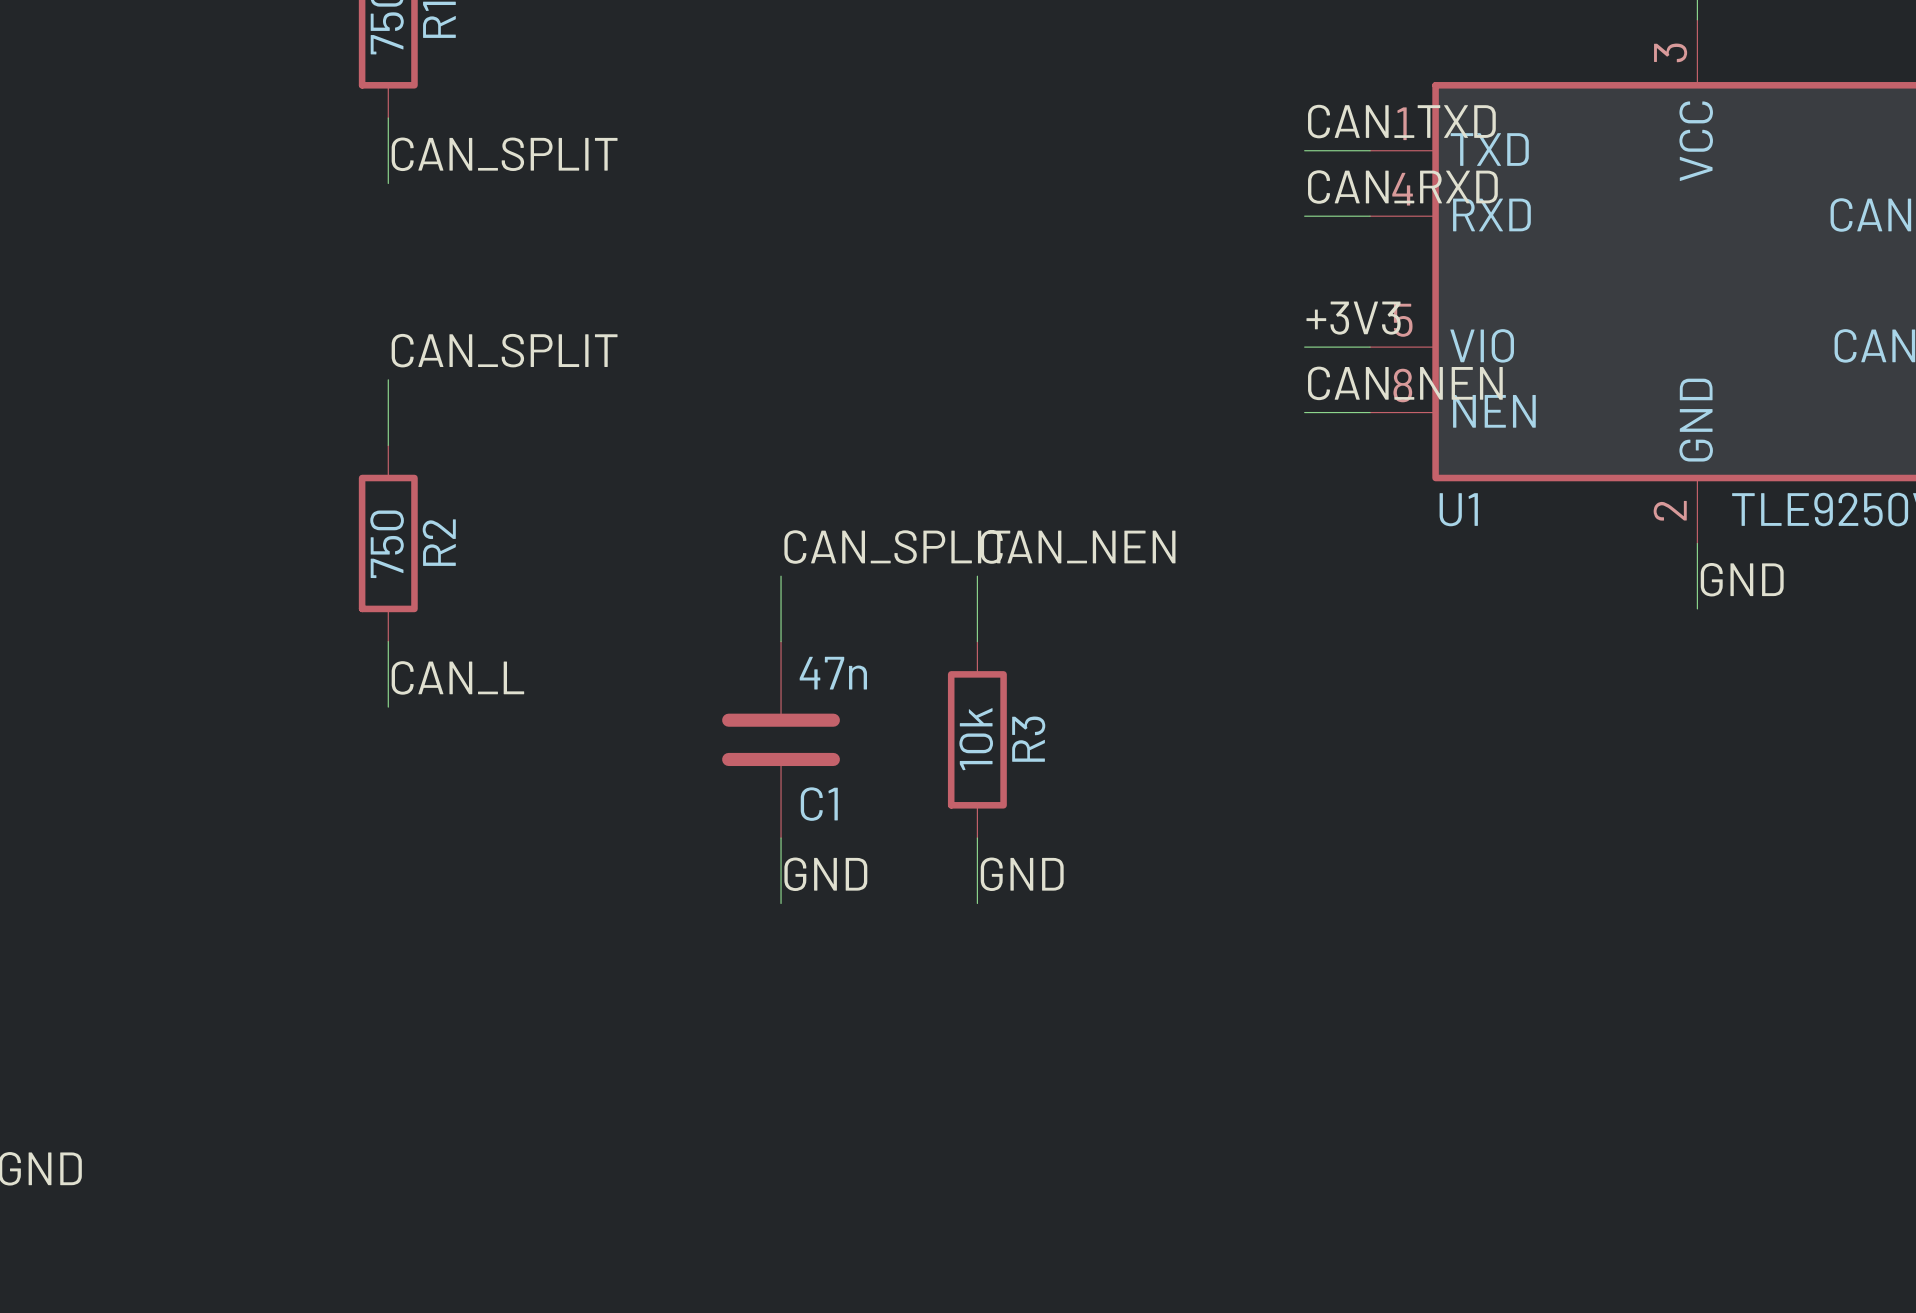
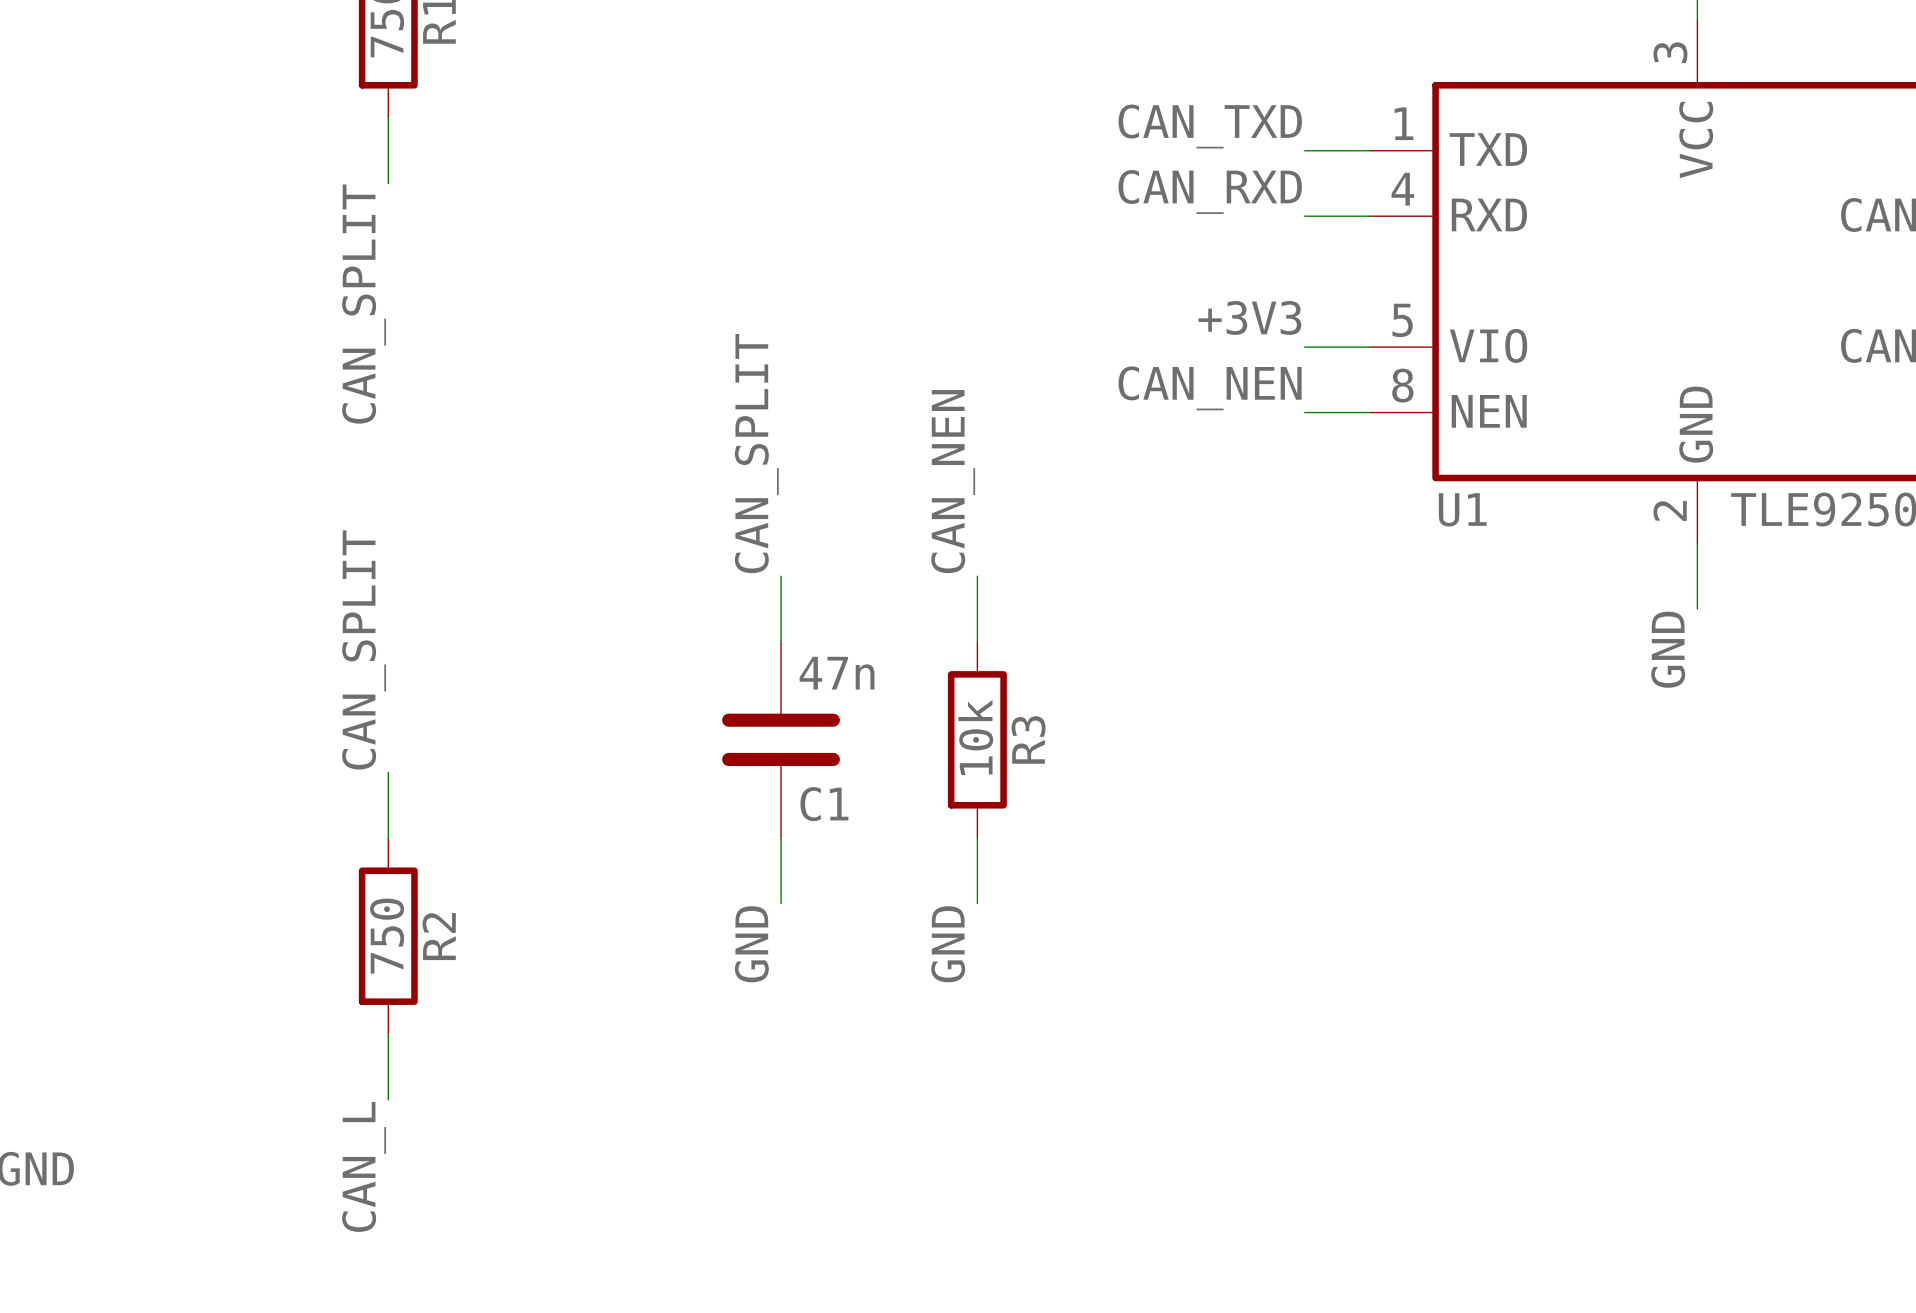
label position: CAN_TXD (1401, 121) -> CAN_TXD (1210, 126)
label rotation: 0° (504, 154) -> 90° counterclockwise (364, 304)
label position: CAN_RXD (1402, 187) -> CAN_RXD (1210, 191)
label position: +3V3 (1353, 318) -> +3V3 (1249, 317)
label rotation: 0° (504, 350) -> 90° counterclockwise (364, 649)
label position: CAN_SPLIT (504, 350) -> CAN_SPLIT (364, 649)
wire: (388, 379) (388, 445) -> (388, 772) (388, 838)
label position: CAN_NEN (1405, 383) -> CAN_NEN (1210, 388)
R2 position: (388, 543) -> (388, 936)
label rotation: 0° (897, 547) -> 90° counterclockwise (756, 453)
label rotation: 0° (1078, 547) -> 90° counterclockwise (953, 481)
label rotation: 0° (1742, 579) -> 90° counterclockwise (1668, 649)
label position: GND (1742, 579) -> GND (1668, 649)
wire: (388, 641) (388, 707) -> (388, 1034) (388, 1099)
label rotation: 0° (457, 677) -> 90° counterclockwise (364, 1166)
label position: CAN_L (457, 677) -> CAN_L (364, 1166)
label rotation: 0° (825, 874) -> 90° counterclockwise (751, 944)
label position: GND (825, 874) -> GND (751, 944)
label rotation: 0° (1022, 874) -> 90° counterclockwise (948, 944)
label position: GND (1022, 874) -> GND (948, 944)

